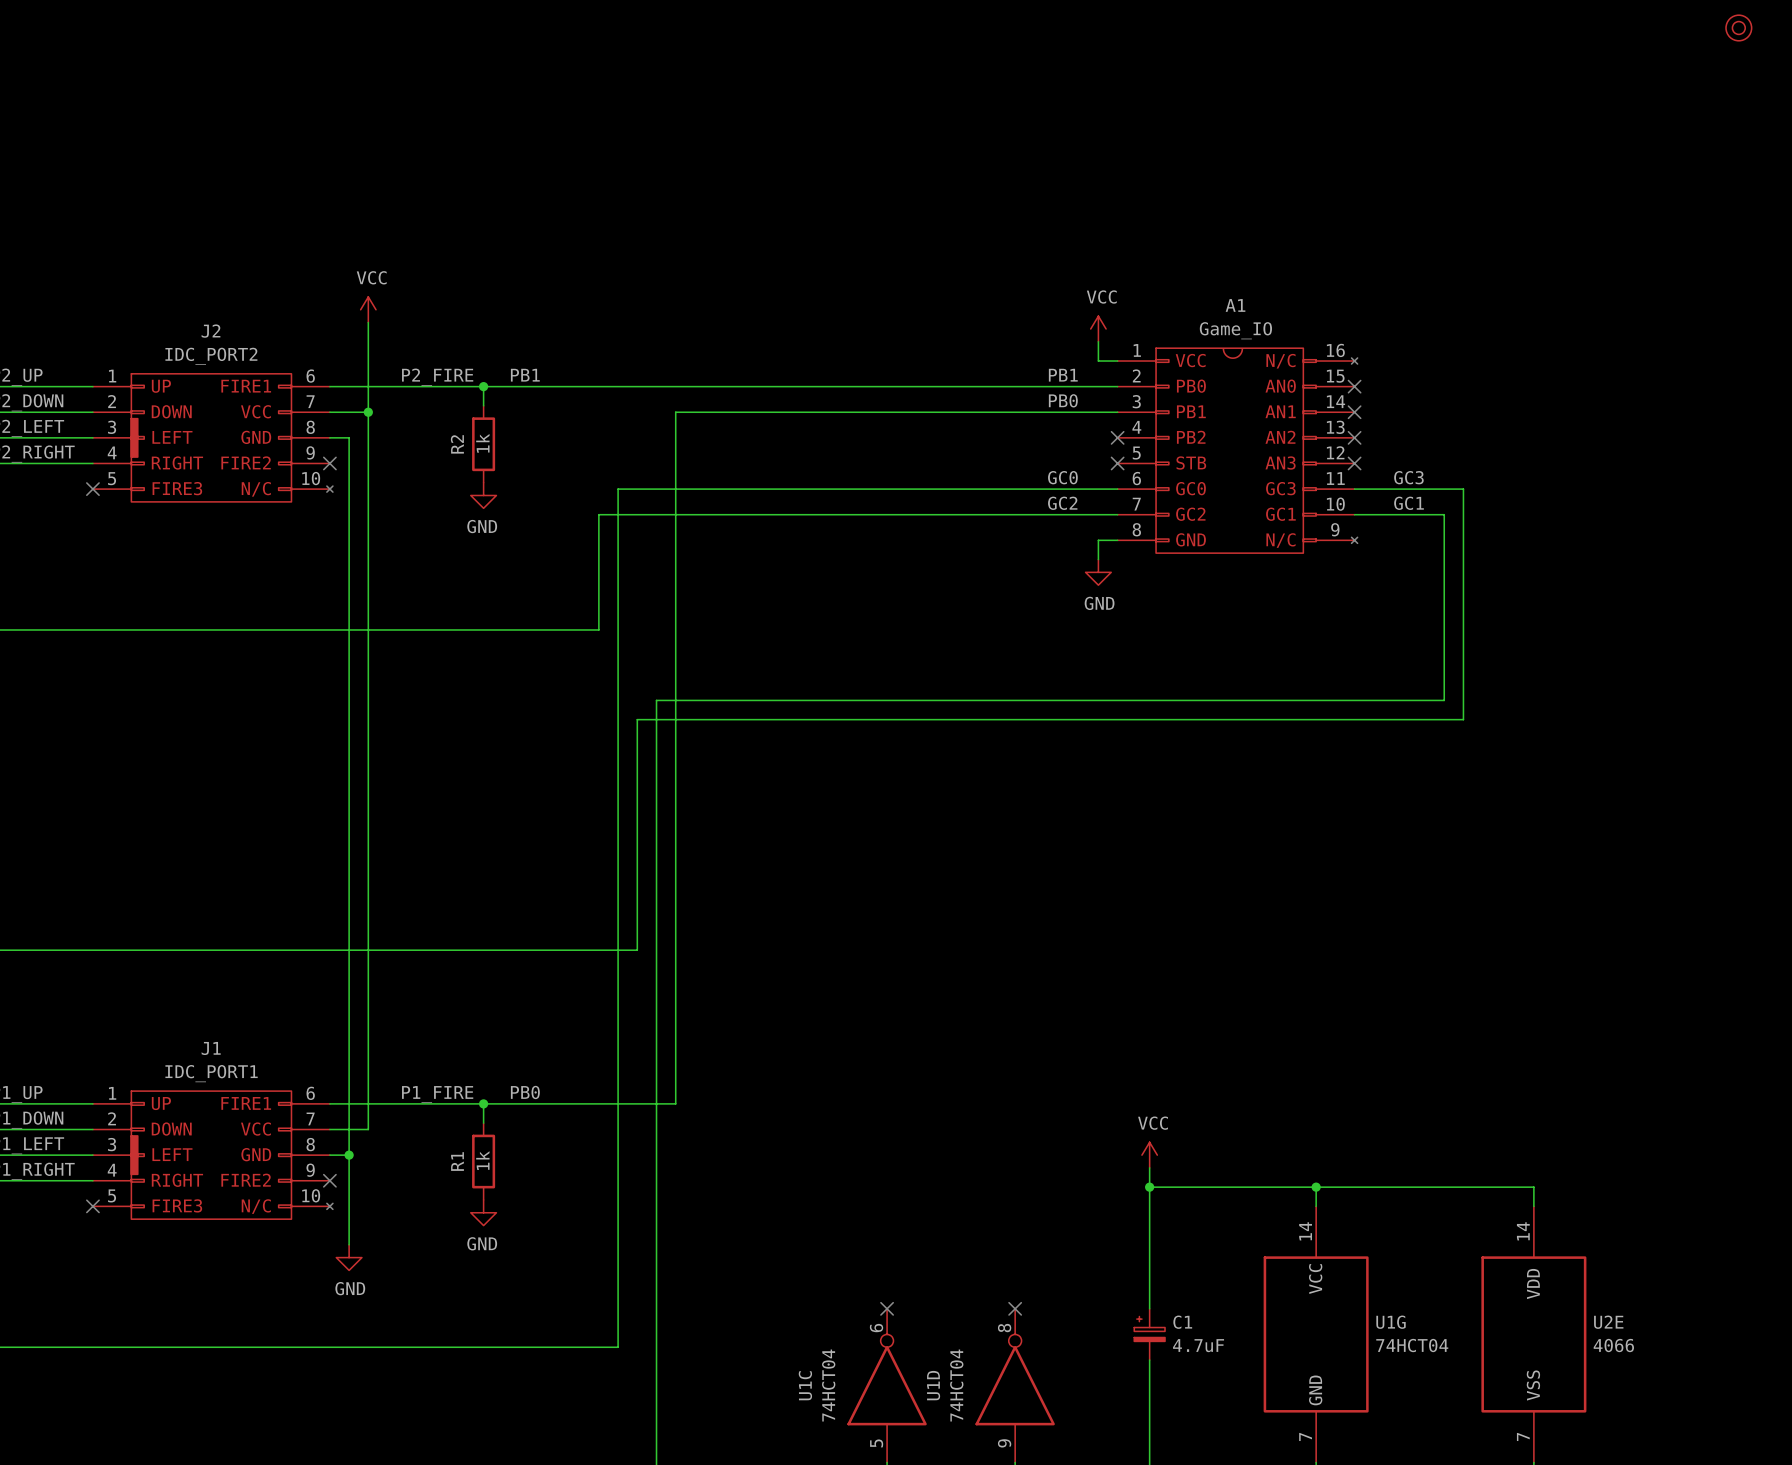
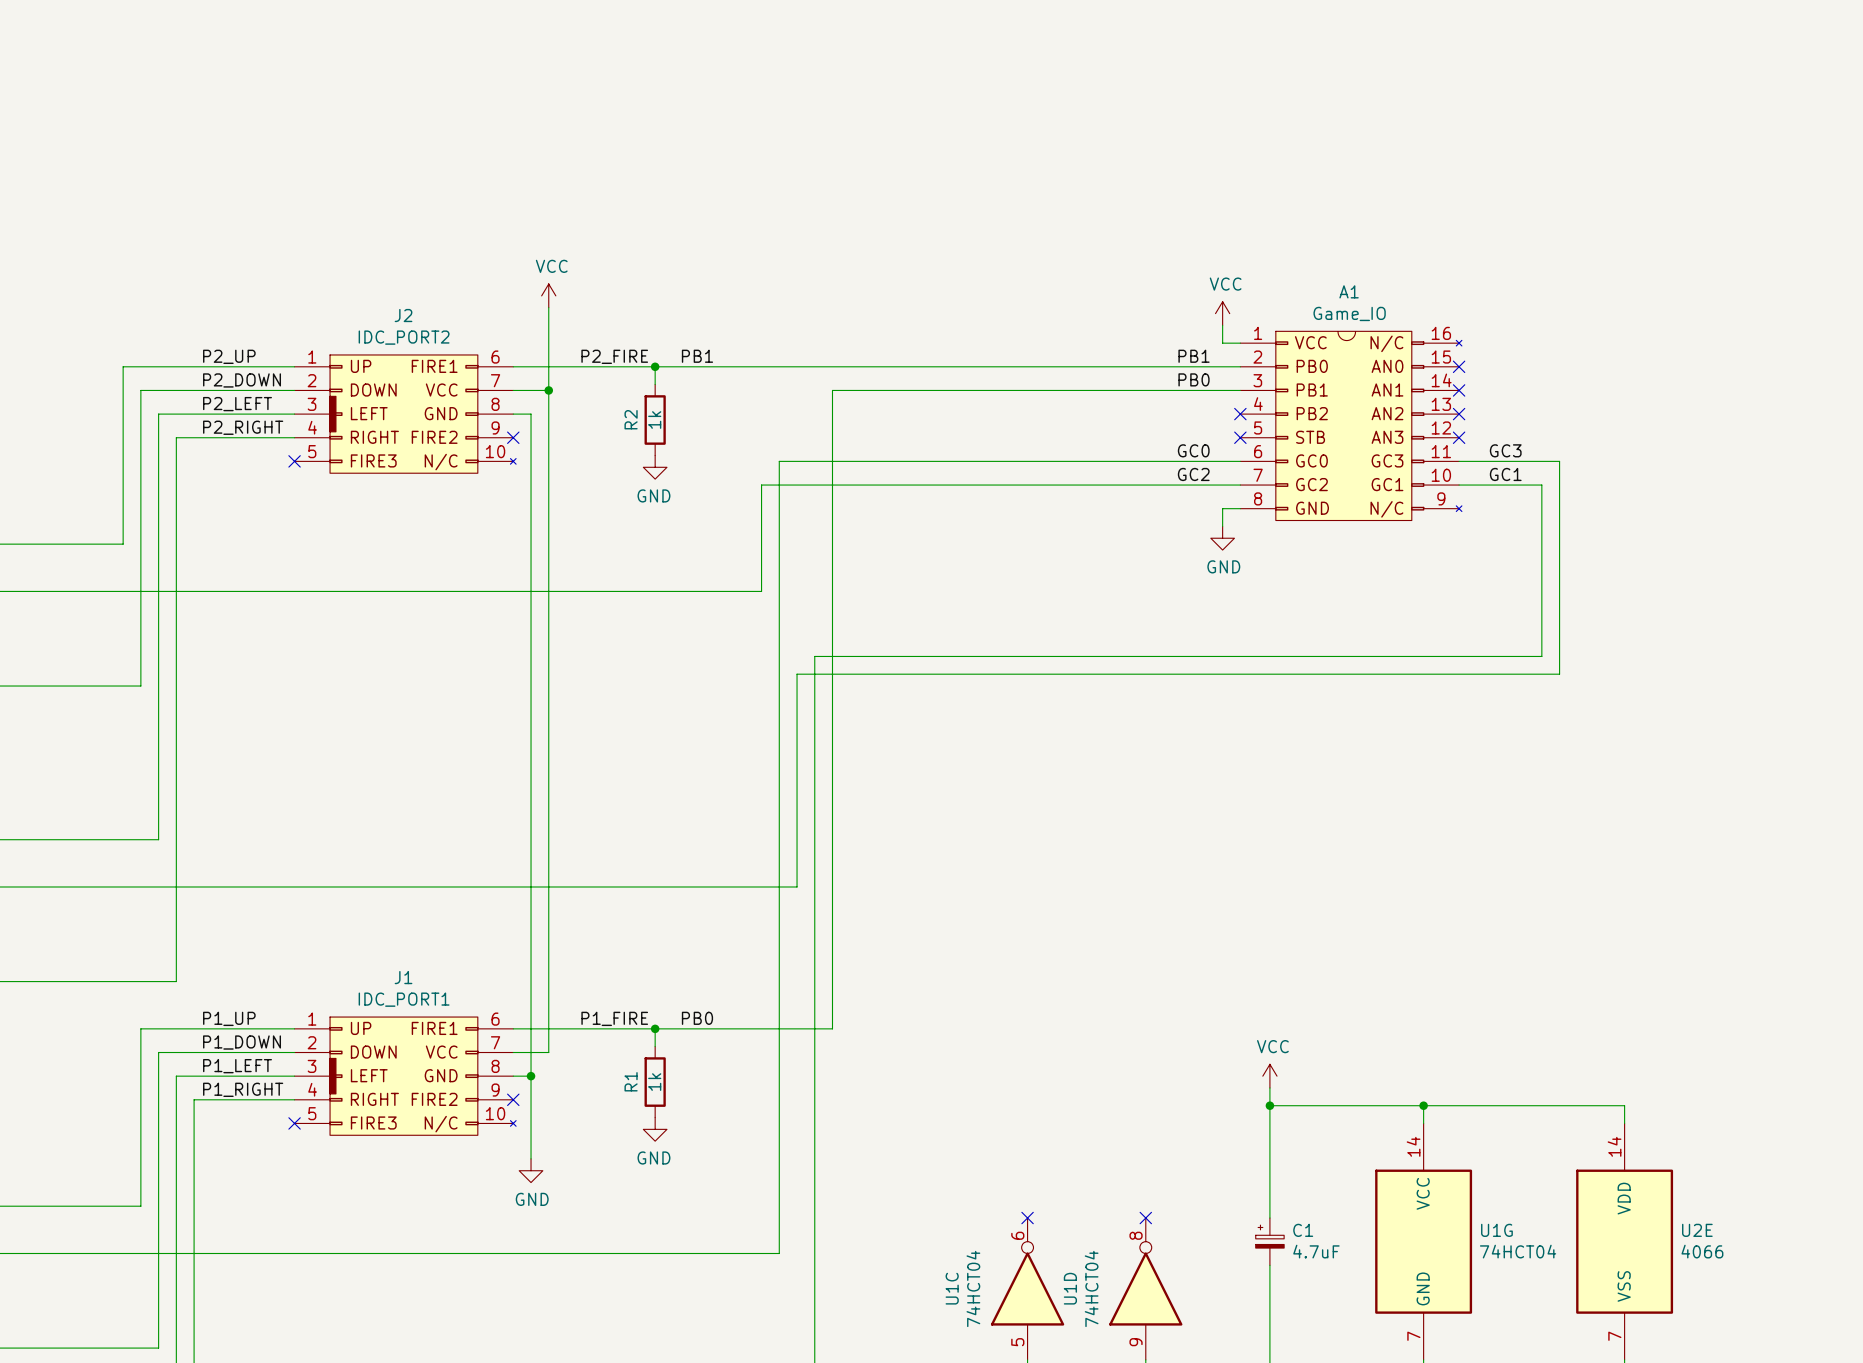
part: (1738, 27) -> none

